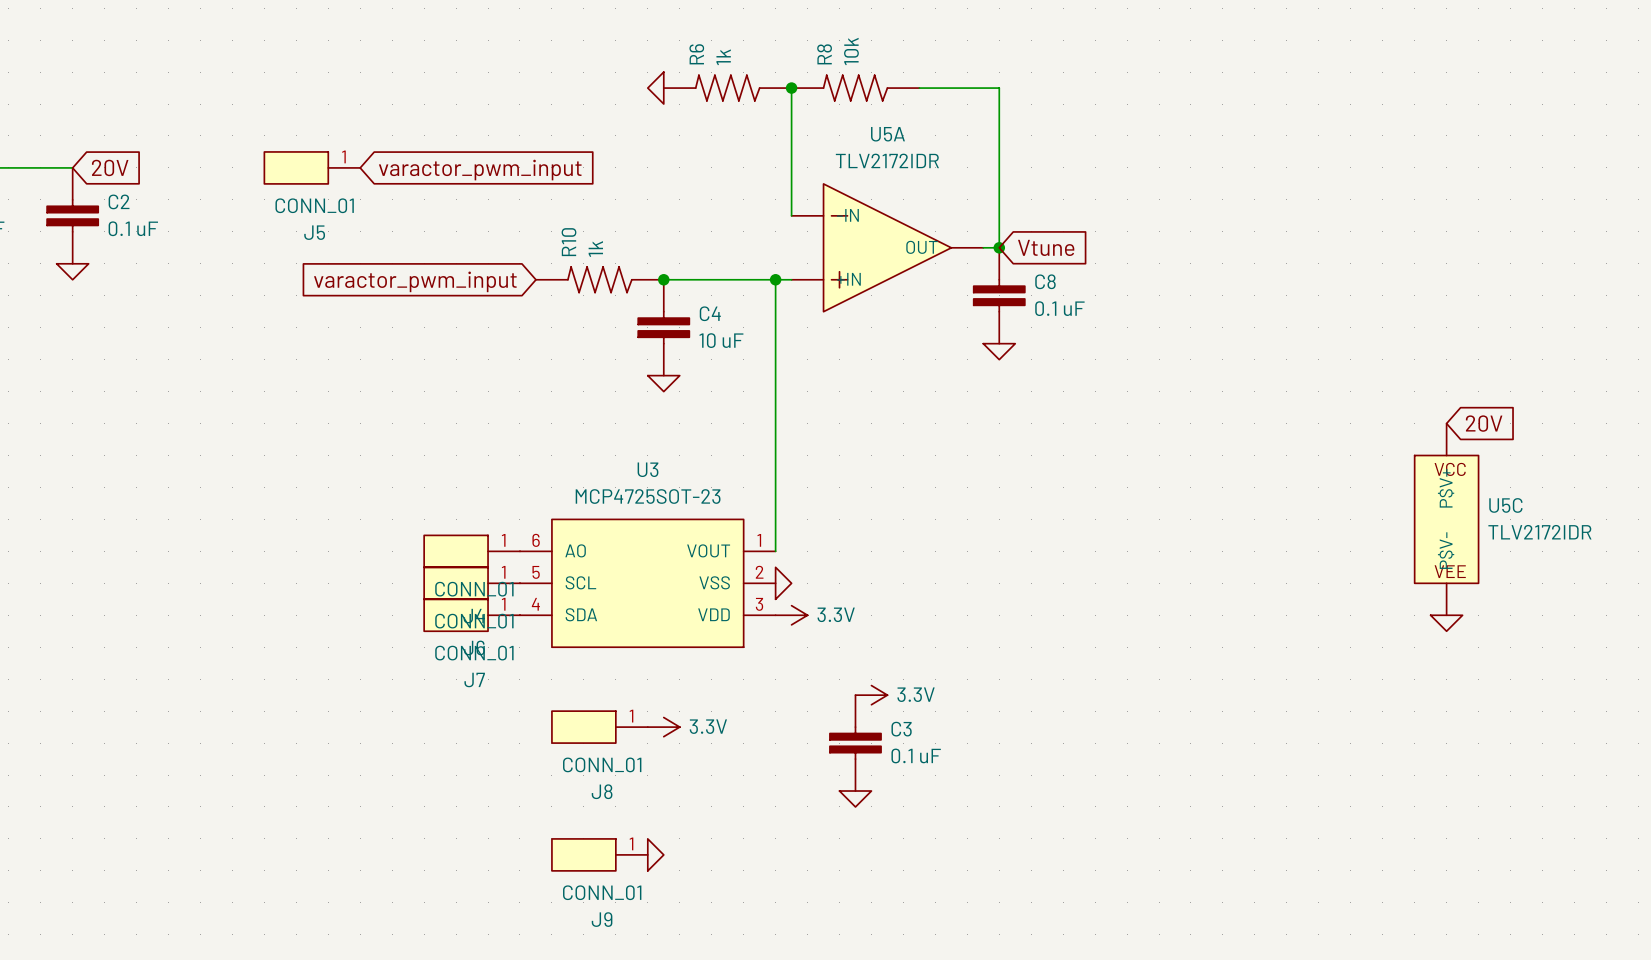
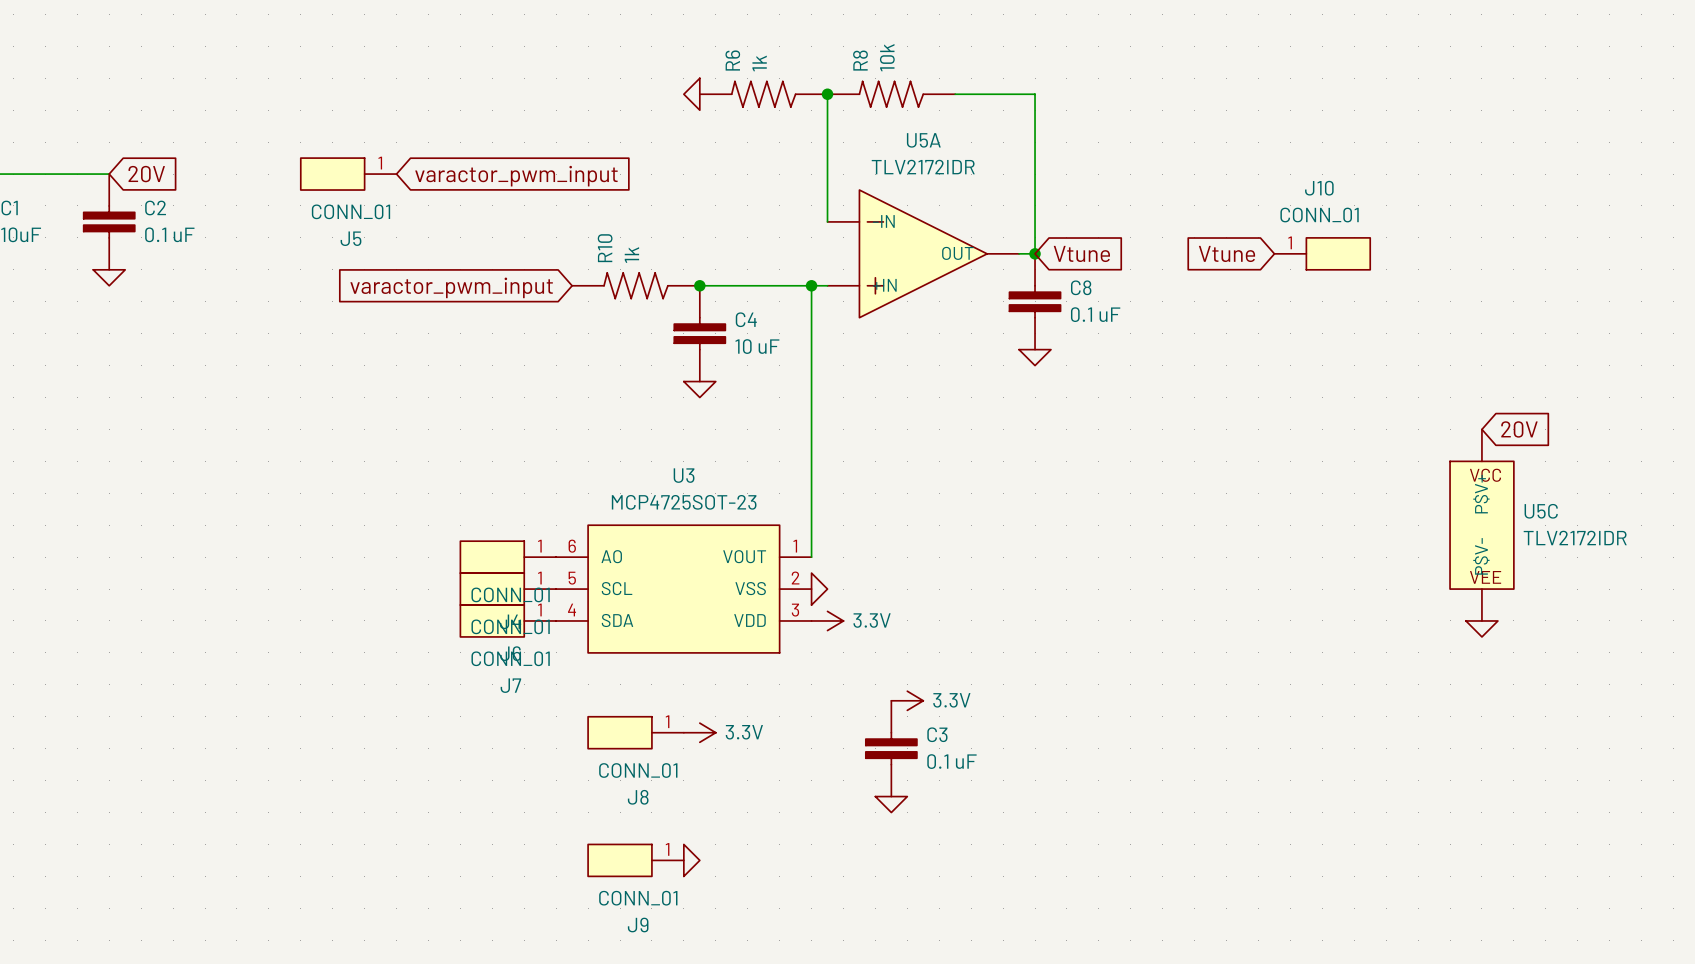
global label: none -> Vtune (1226, 253)
J10: none -> CONN_01 (1322, 253)

